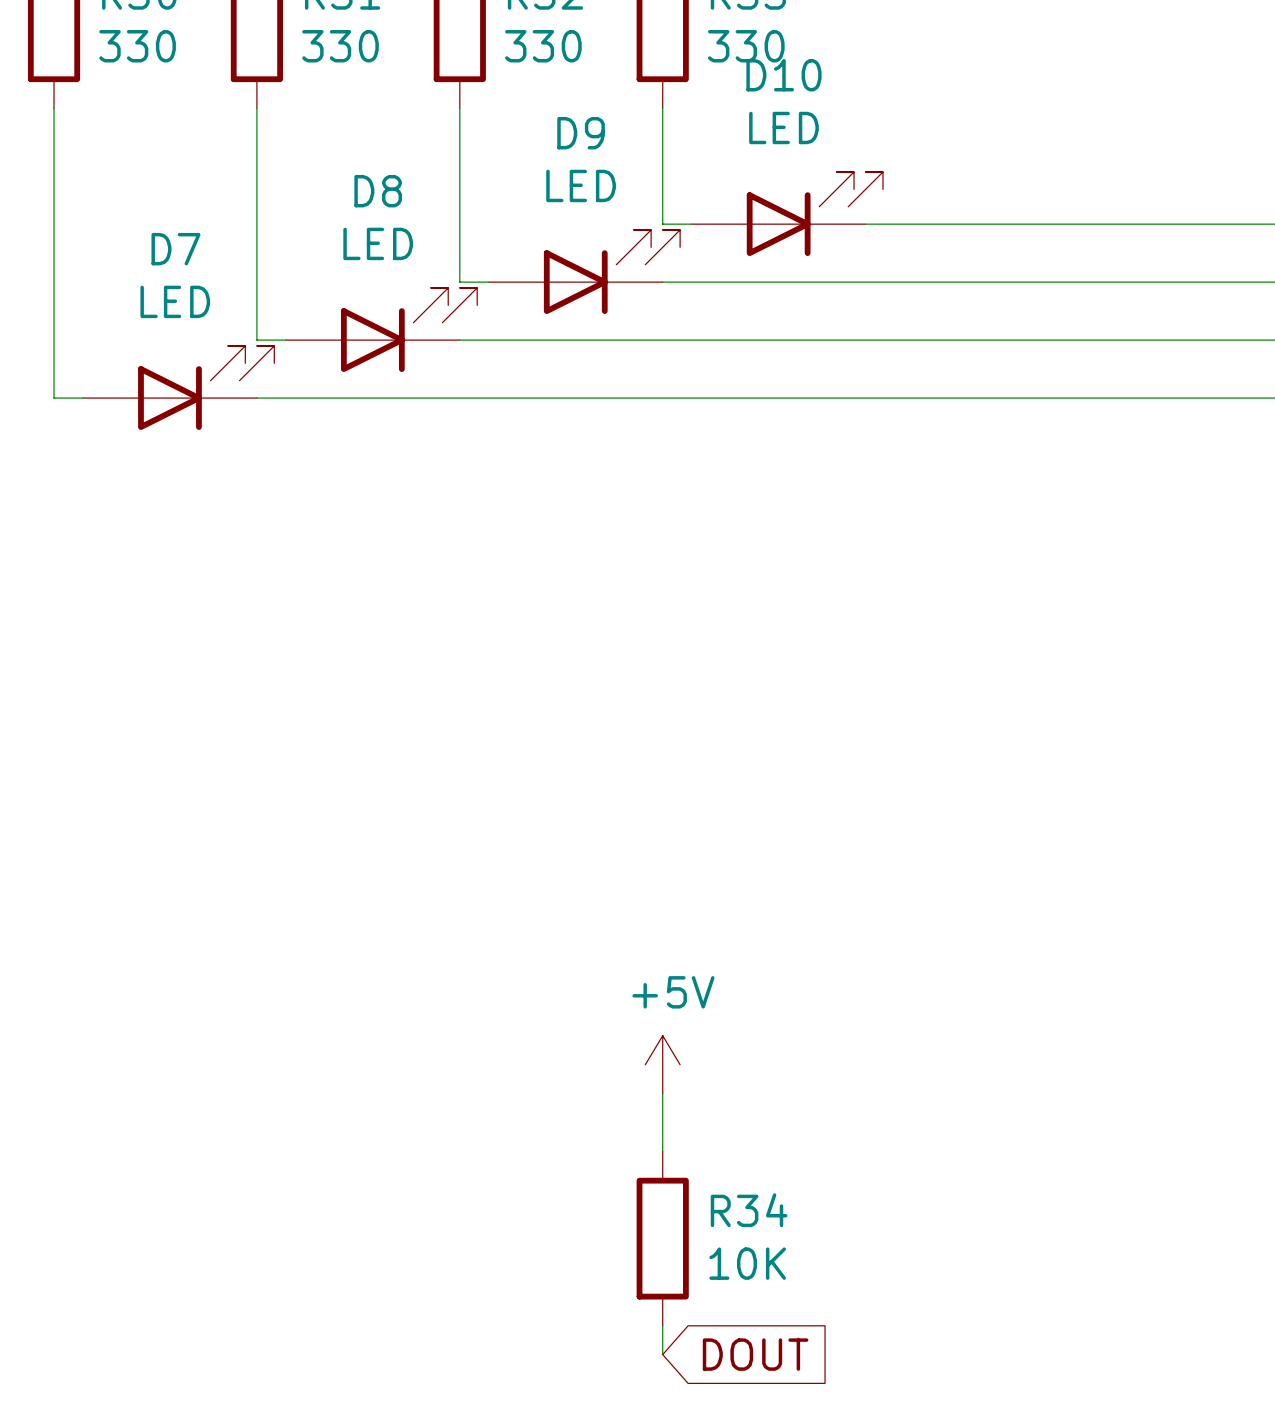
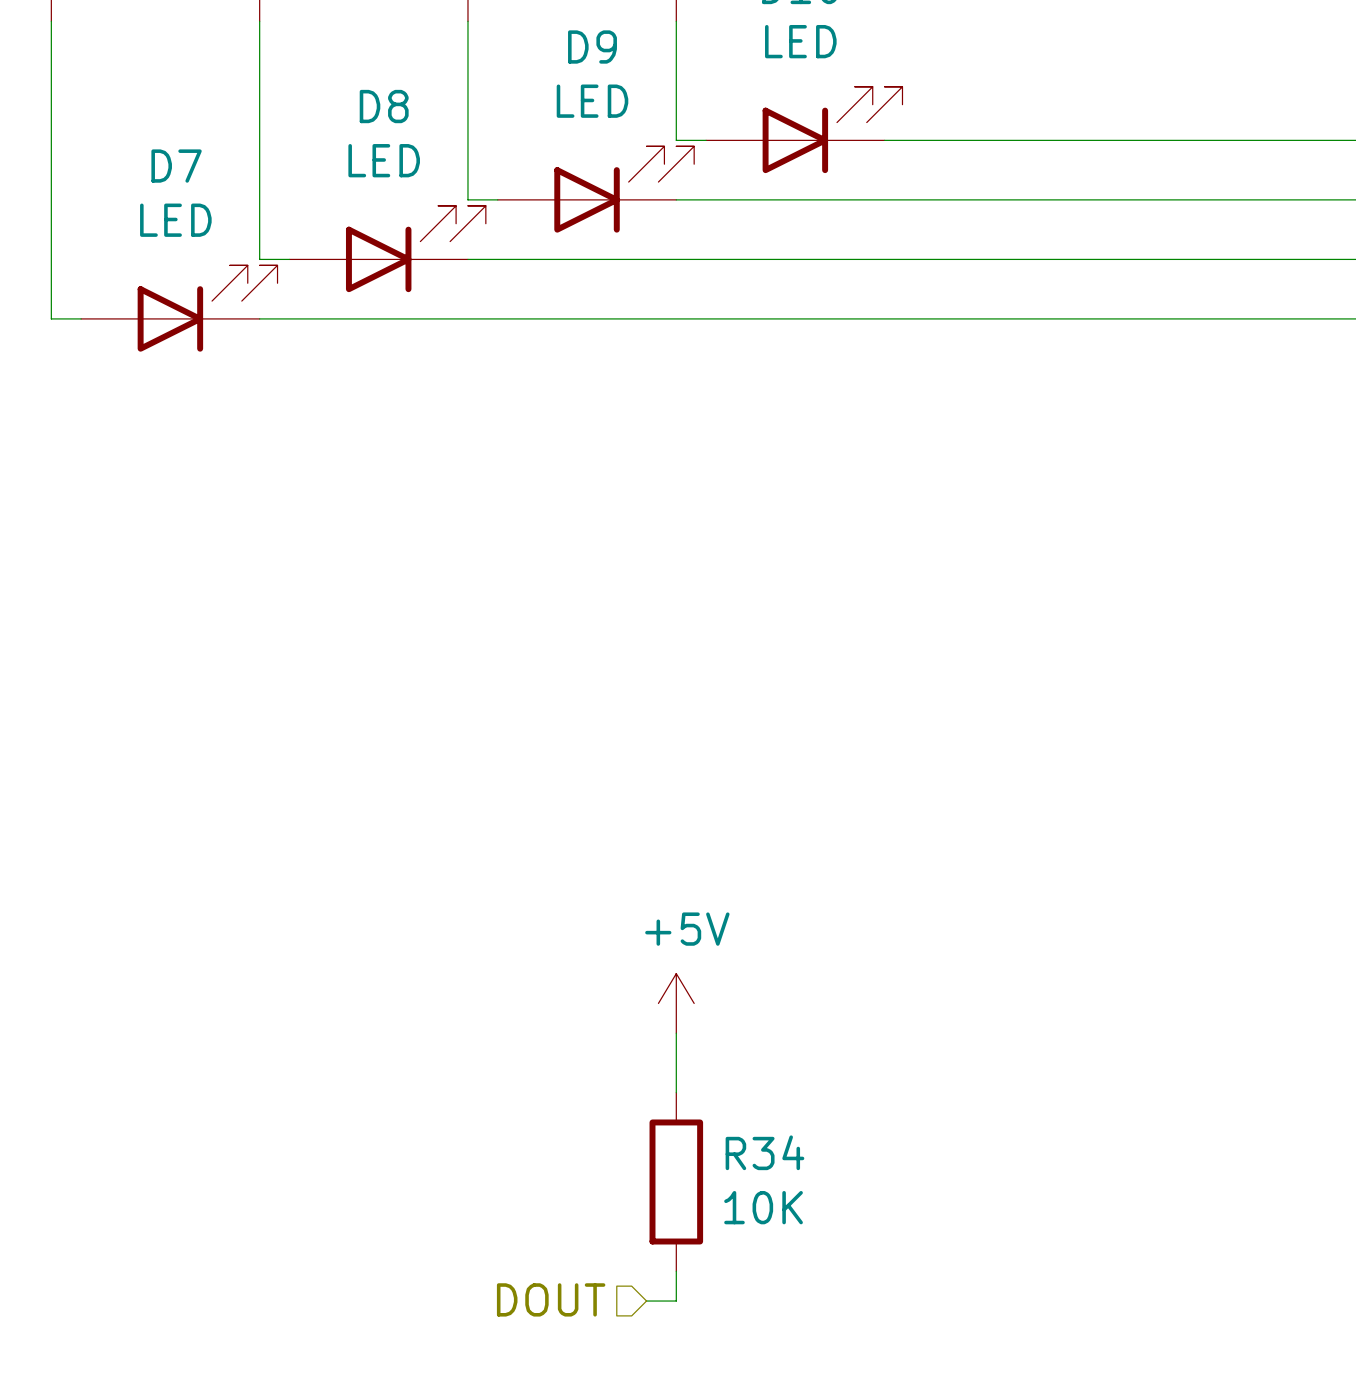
hierarchical label: none -> DOUT (551, 1299)
wire: none -> (646, 1301) (676, 1301)
global label: DOUT (755, 1354) -> none

